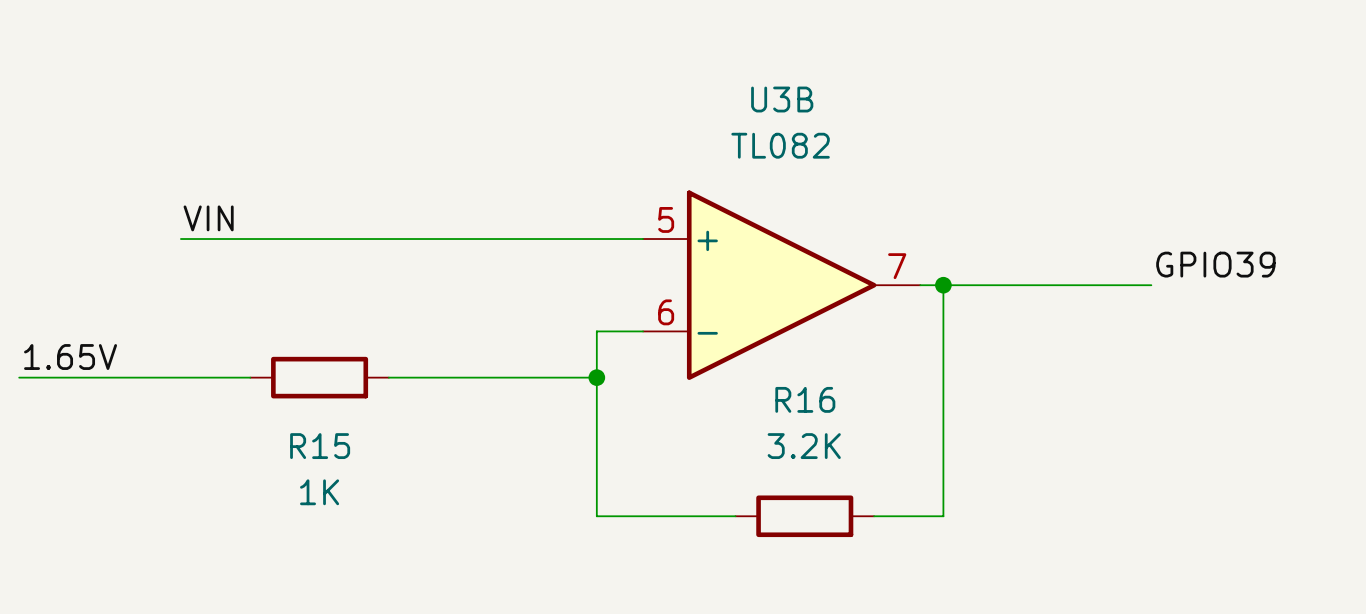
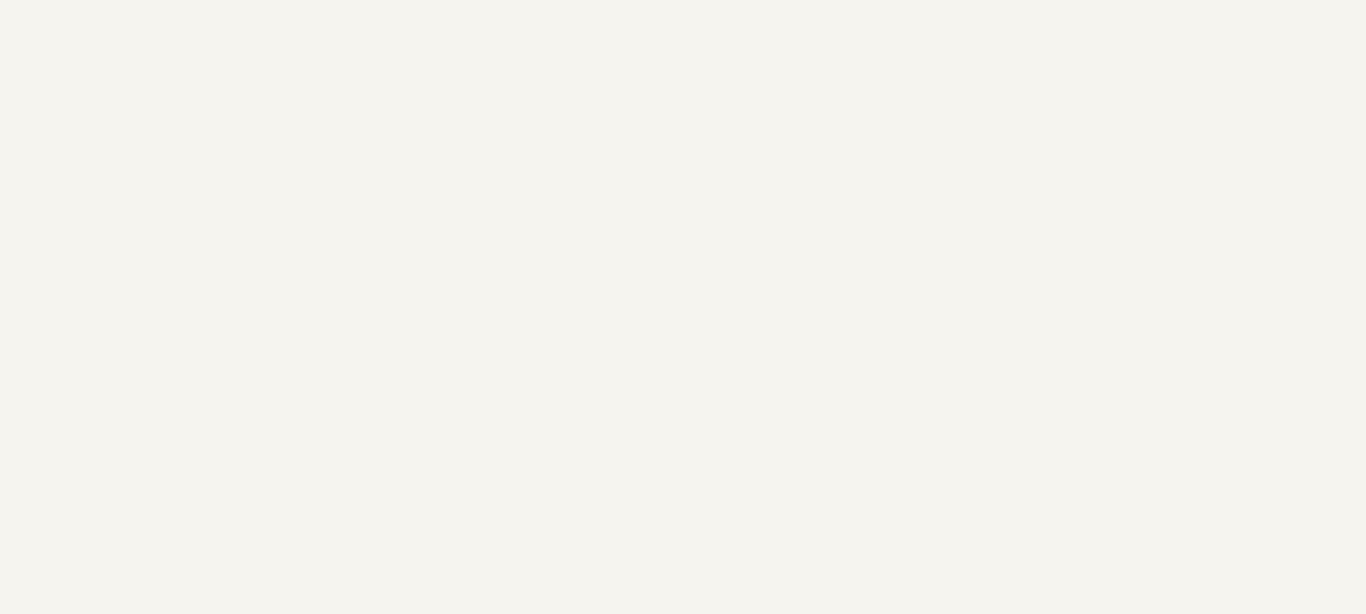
label: VIN (208, 218) -> none
wire: (180, 239) (643, 239) -> none
label: GPIO39 (1215, 264) -> none
U3B: TL082 (781, 285) -> none
wire: (920, 285) (1151, 285) -> none
wire: (943, 285) (943, 516) (874, 516) -> none
junction: (943, 285) -> none
wire: (643, 331) (596, 331) (596, 516) (735, 516) -> none
label: 1.65V (70, 357) -> none
wire: (19, 377) (250, 377) -> none
R15: 1K (319, 377) -> none
wire: (388, 377) (596, 377) -> none
junction: (596, 377) -> none
R16: 3.2K (804, 516) -> none

